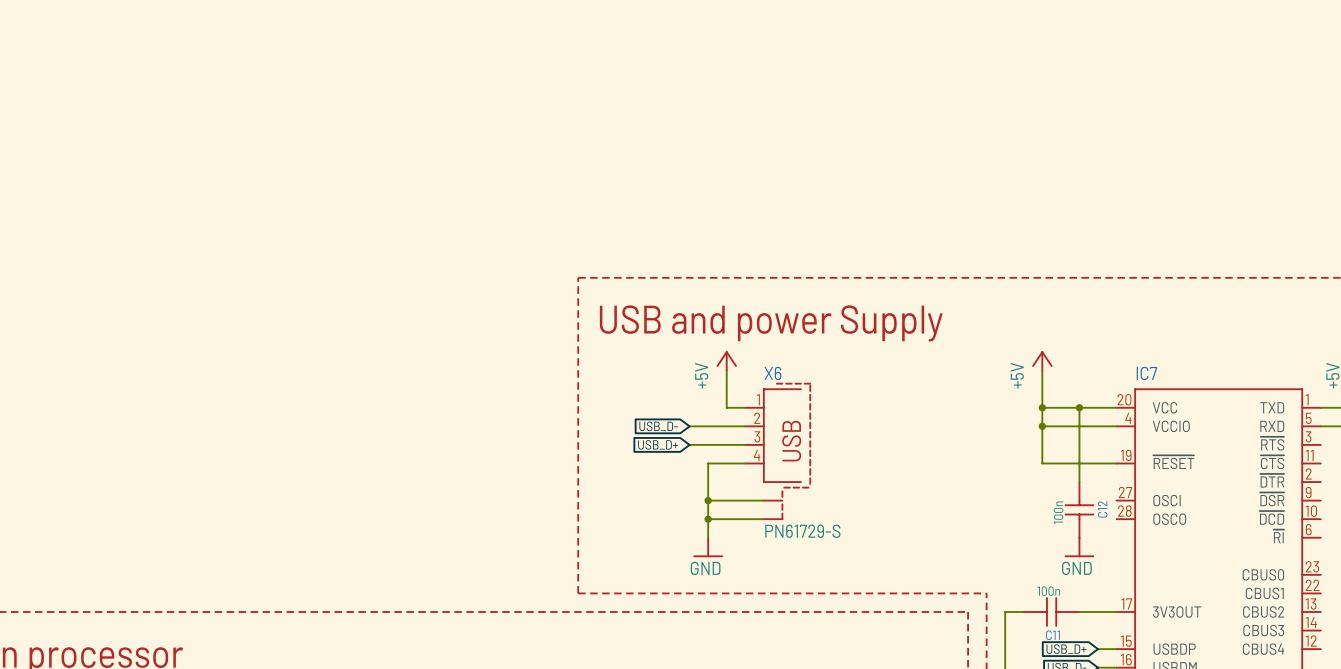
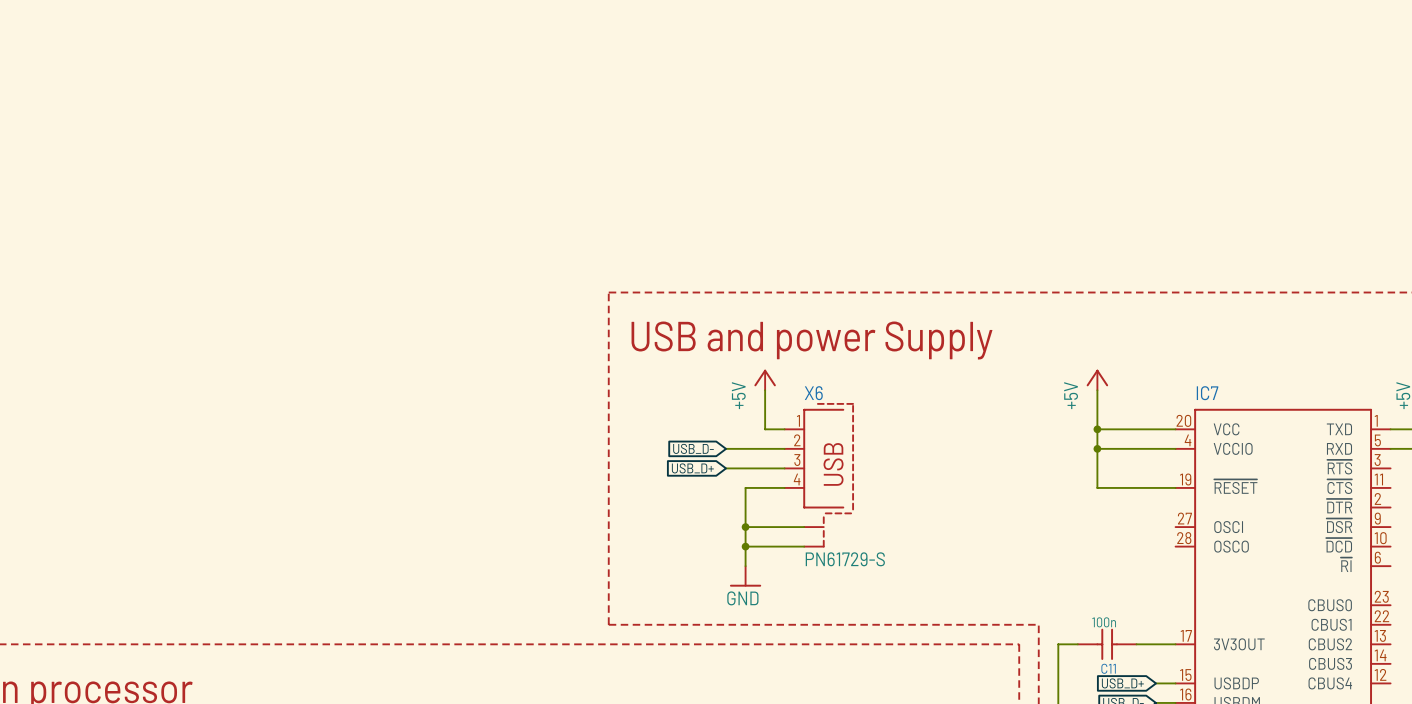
wire: (1079, 407) (1079, 482) -> none
junction: (1079, 407) -> none
C12: 100n (1079, 509) -> none
power symbol: GND (1079, 547) -> none

